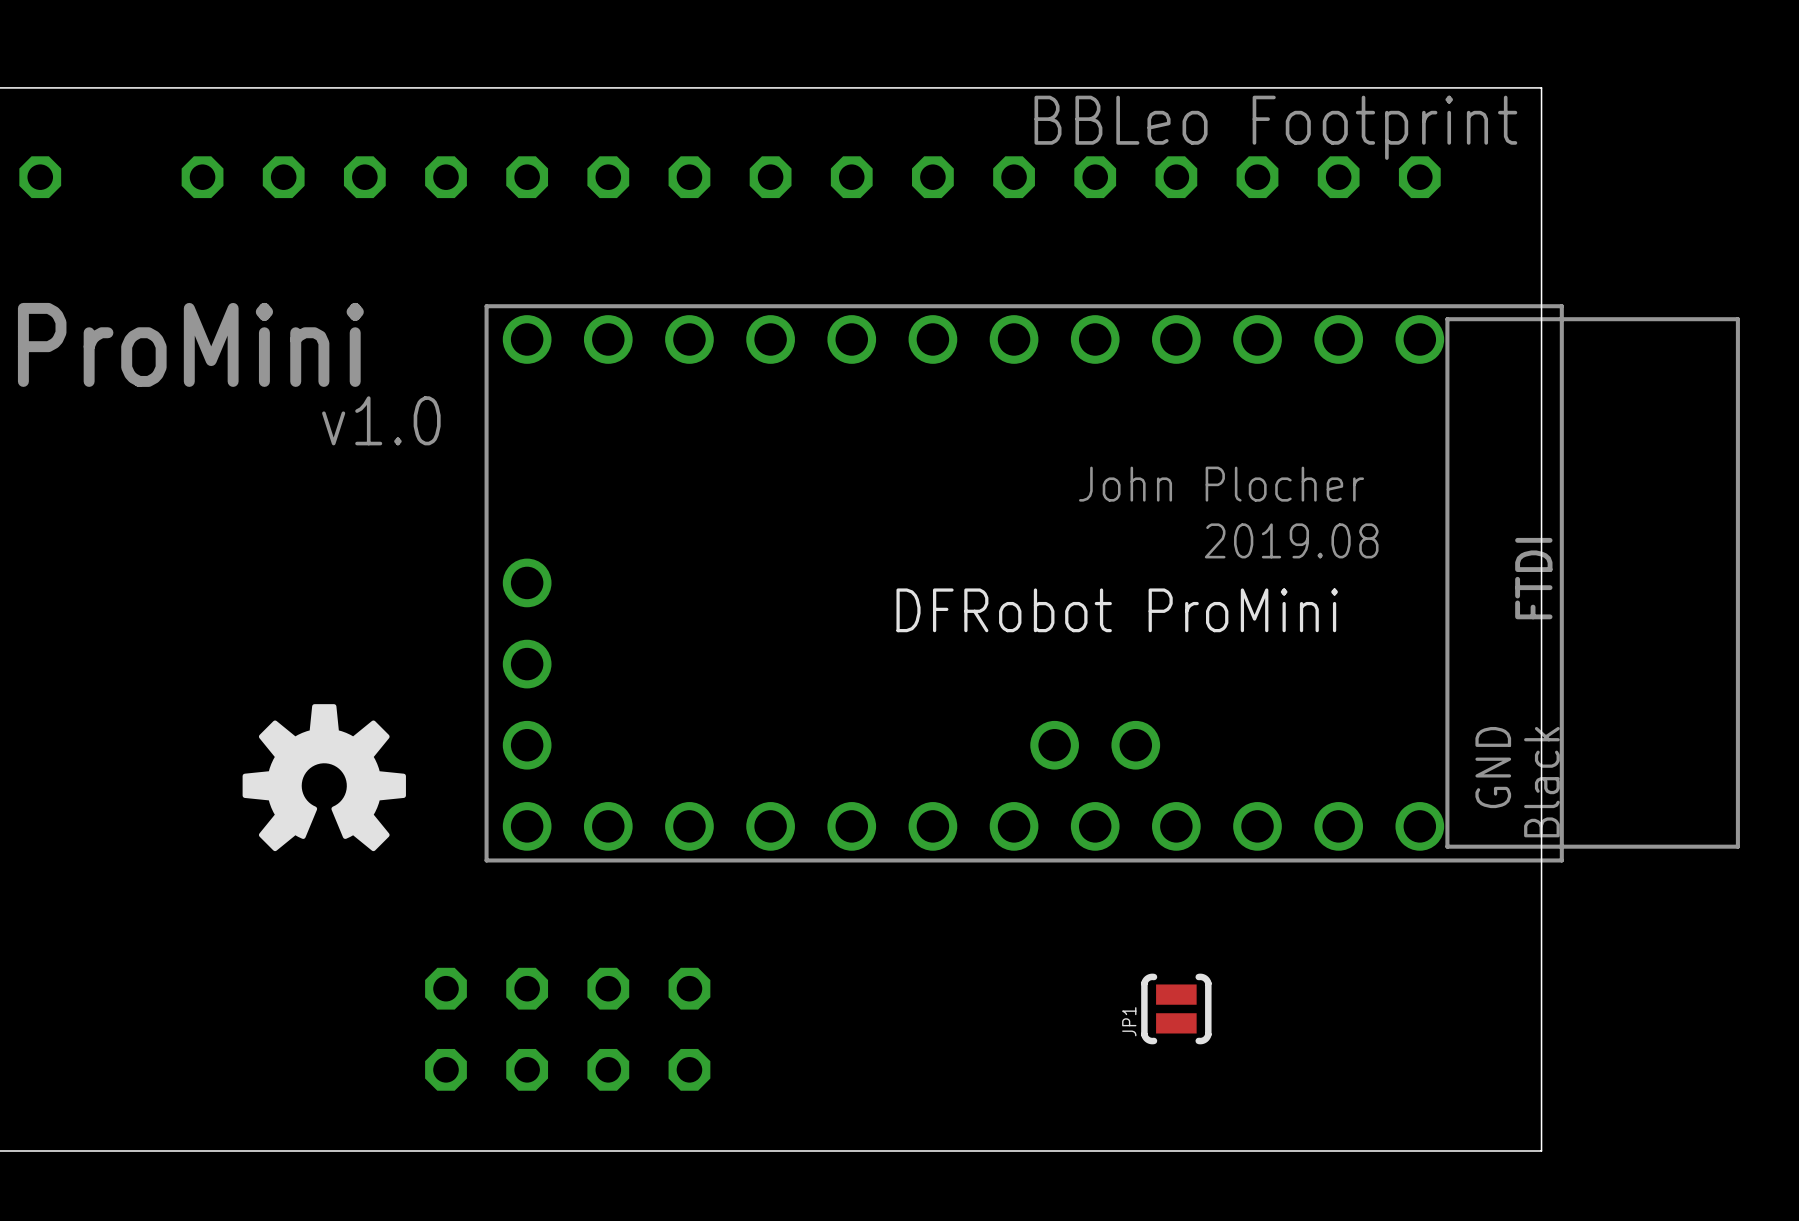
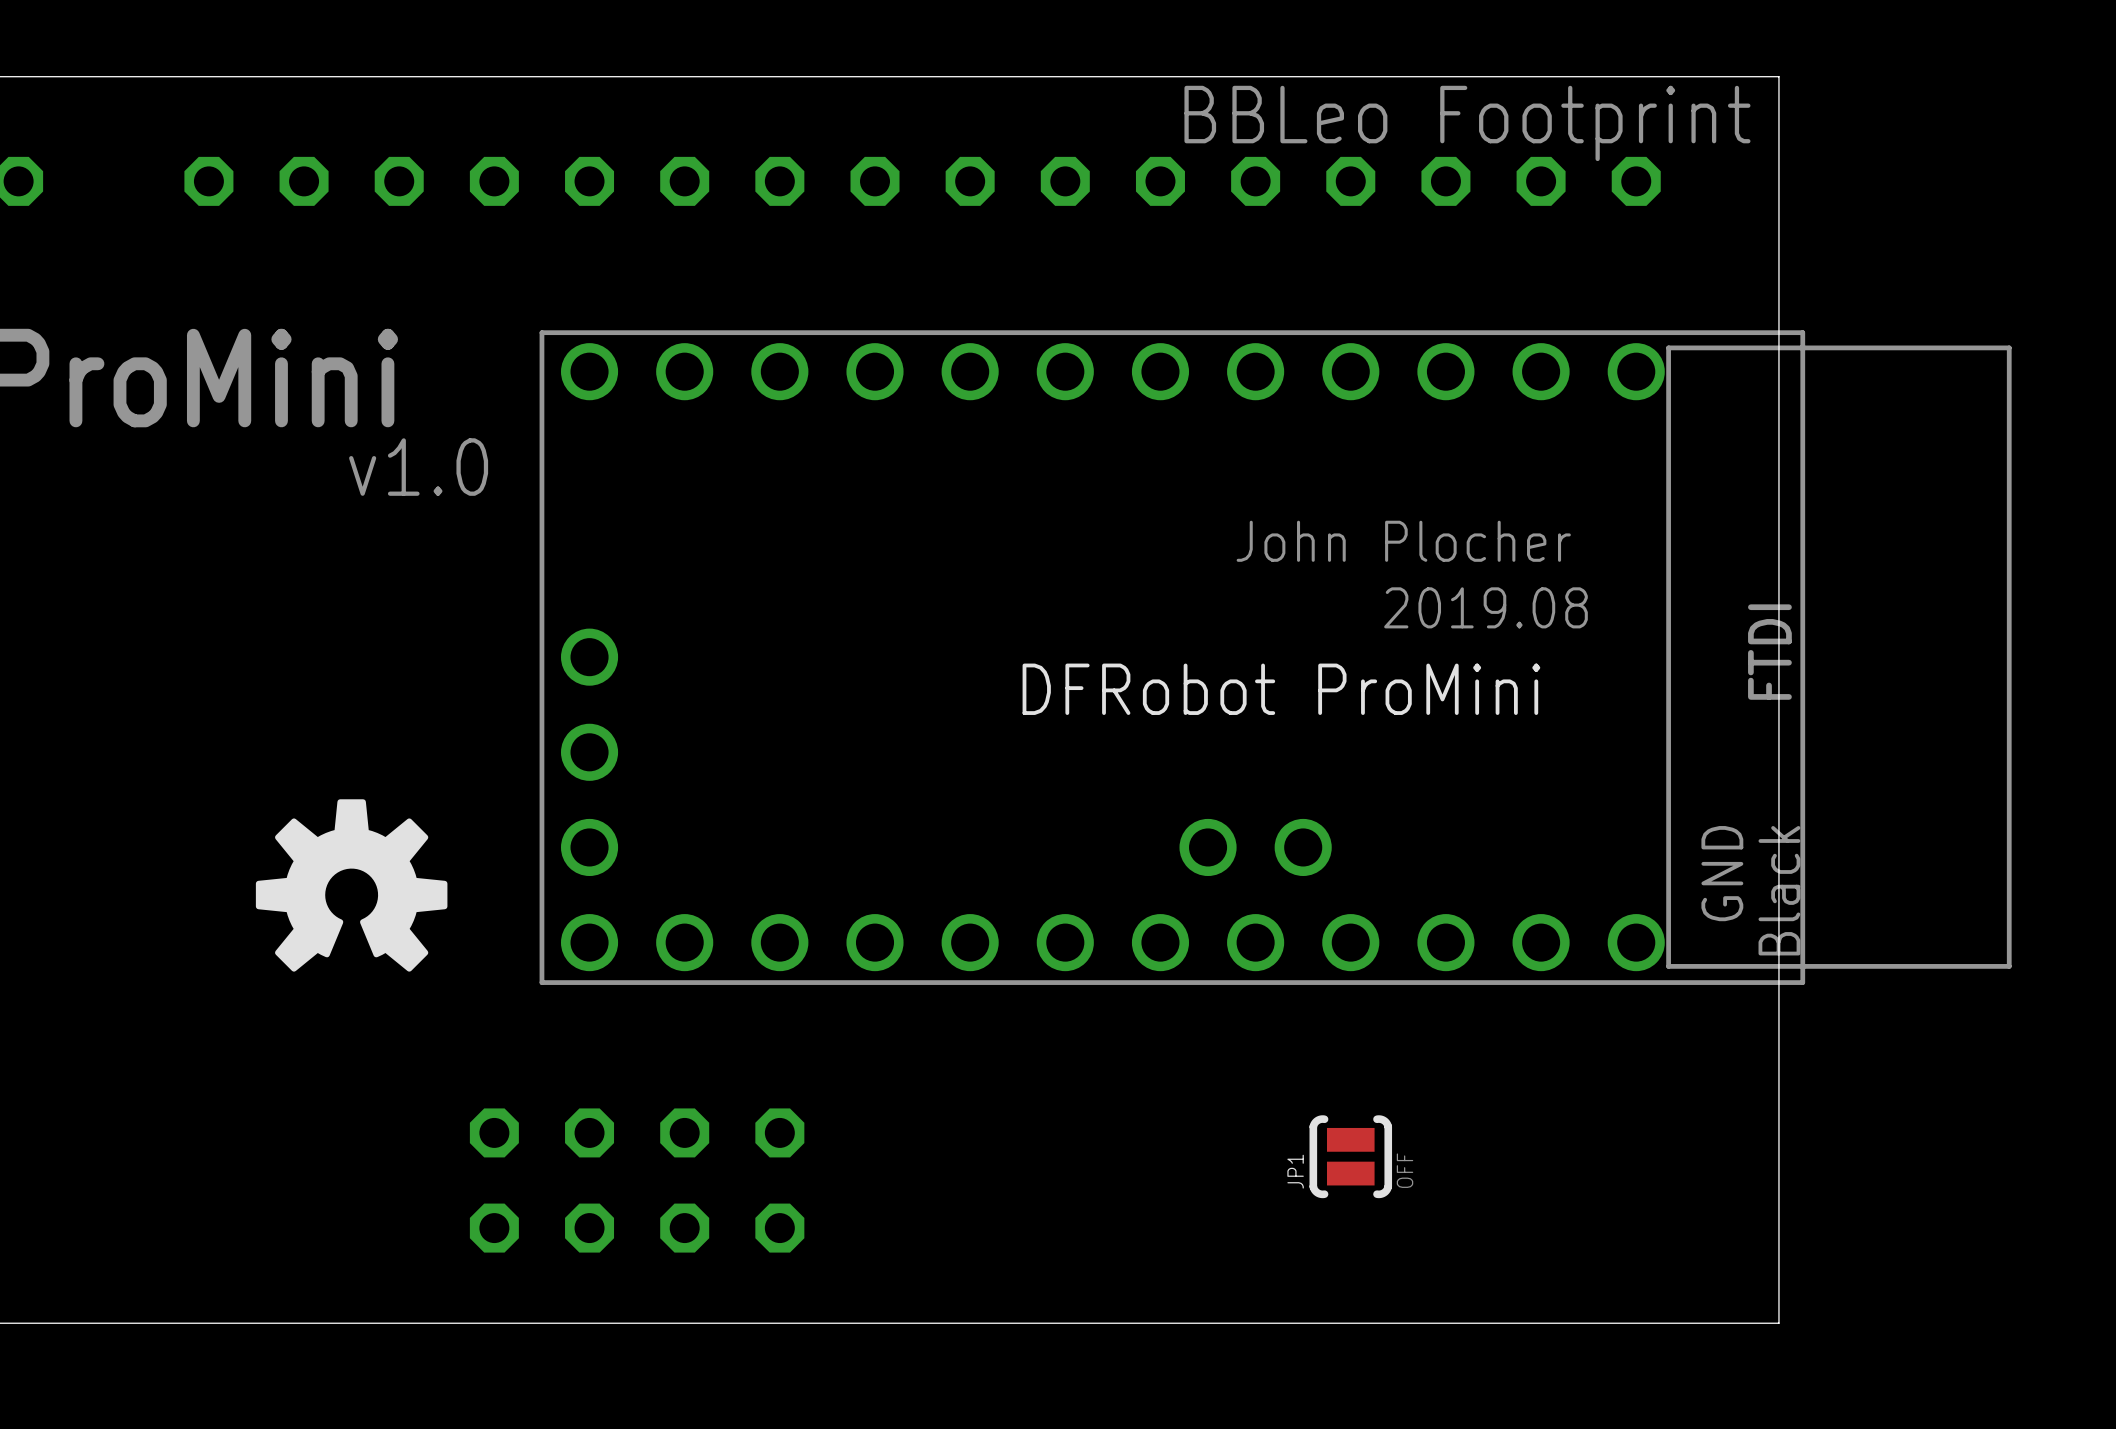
JP1 value: none -> OFF (1405, 1170)

